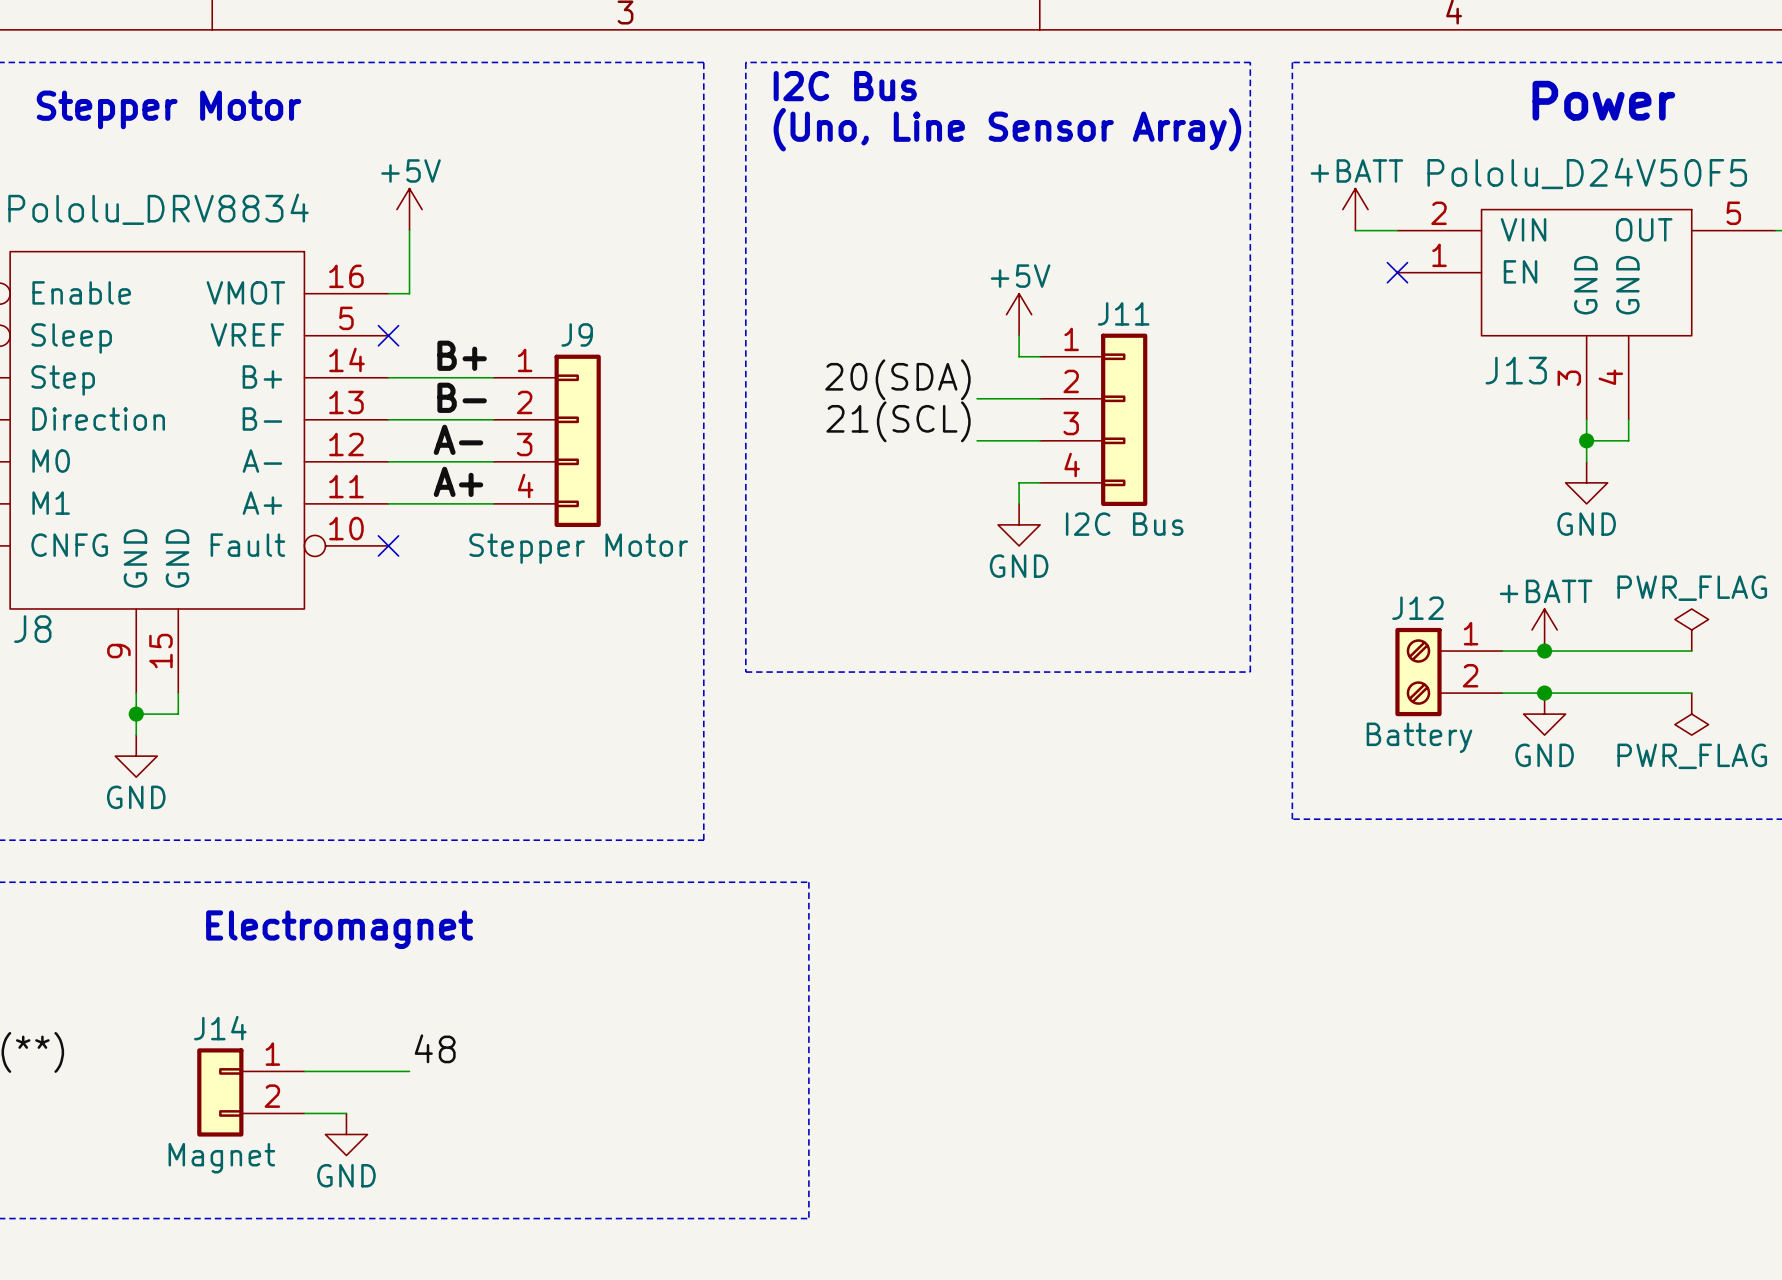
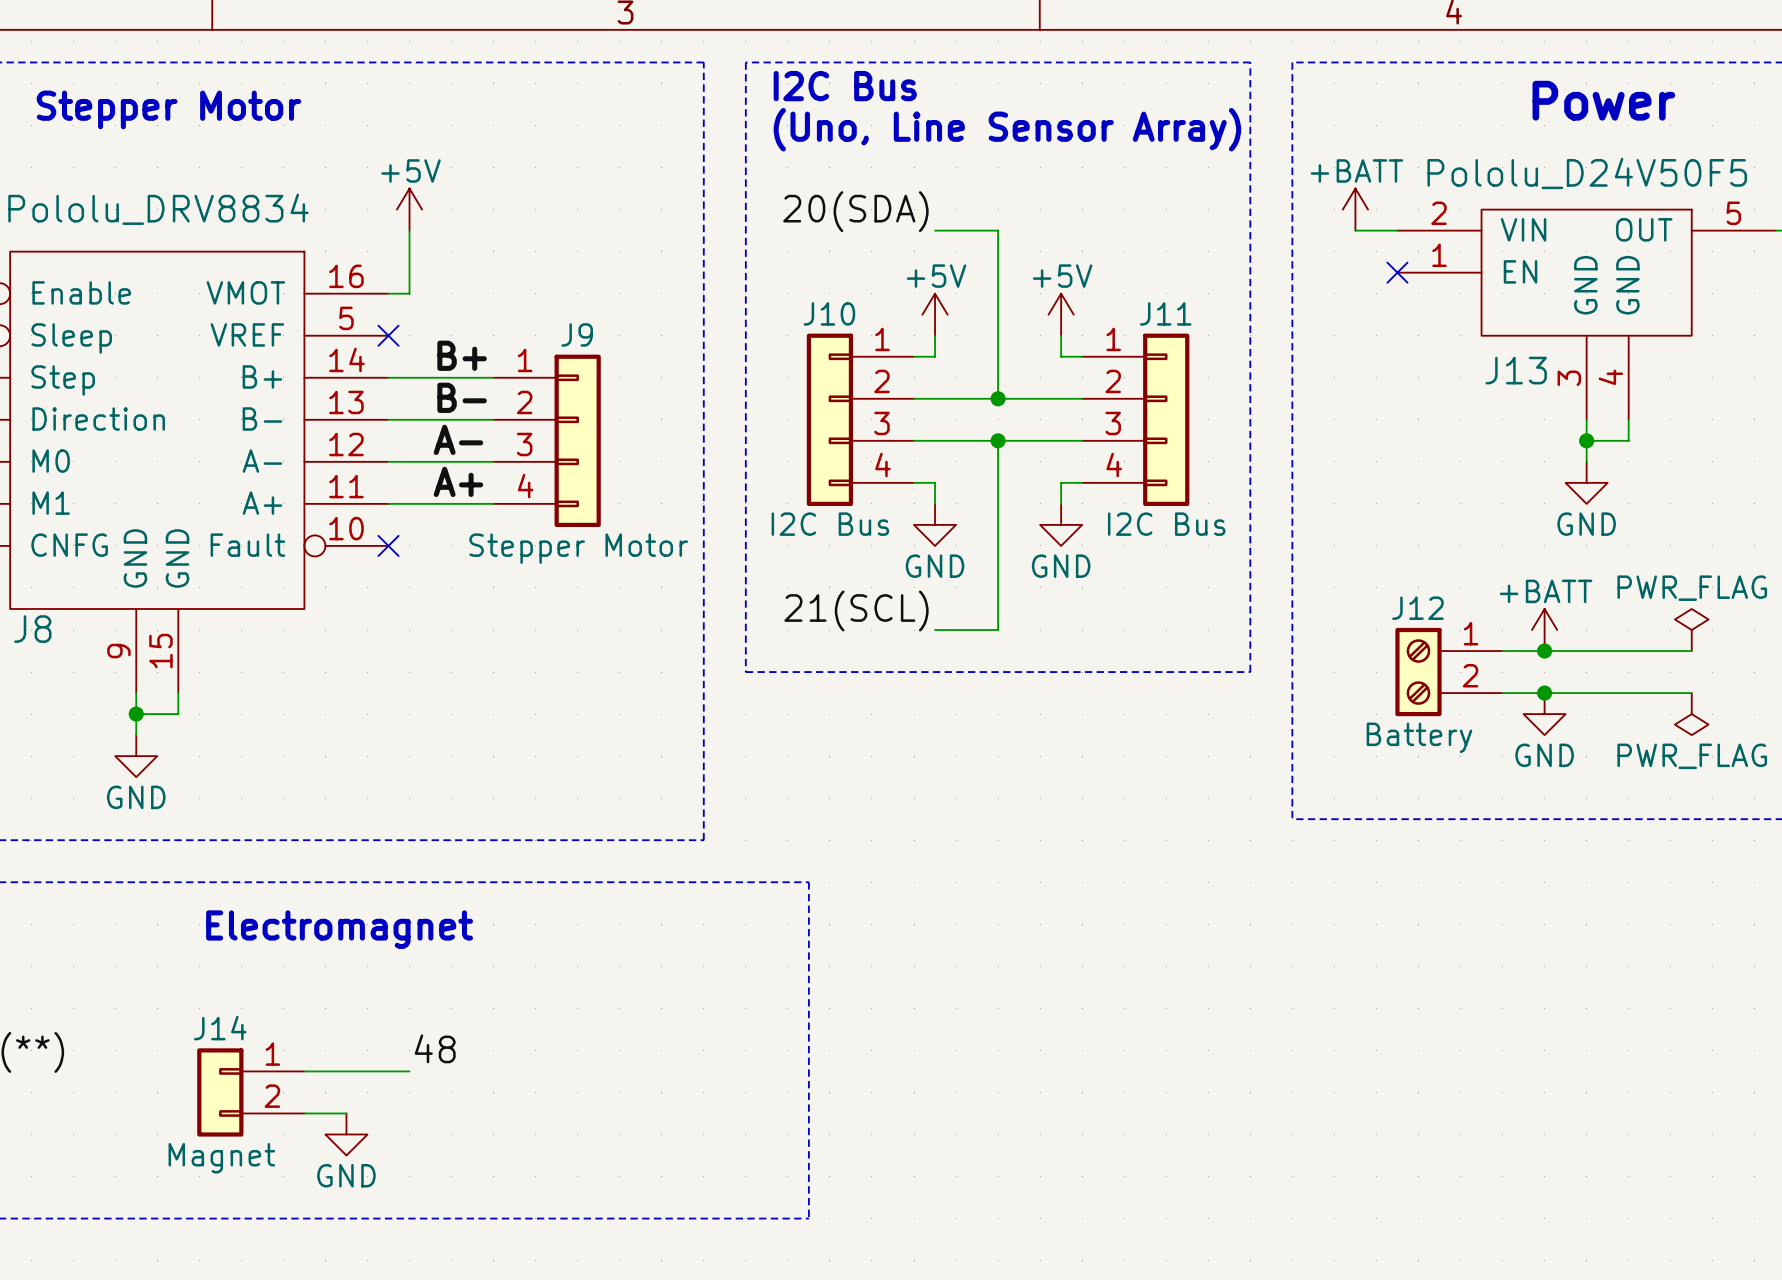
wire: none -> (935, 230) (998, 230) (998, 398)
power symbol: none -> +5V (935, 314)
power symbol: +5V (1019, 314) -> none
power symbol: none -> +5V (1061, 314)
wire: none -> (935, 335) (935, 356) (914, 356)
wire: (1019, 335) (1019, 356) (1040, 356) -> (1061, 335) (1061, 356) (1082, 356)
label position: 20(SDA) (897, 379) -> 20(SDA) (855, 211)
wire: none -> (914, 398) (977, 398)
junction: none -> (998, 398)
J10: none -> I2C Bus (860, 419)
J11 position: (1093, 419) -> (1135, 419)
label position: 21(SCL) (898, 421) -> 21(SCL) (856, 611)
wire: none -> (914, 440) (977, 440)
wire: none -> (998, 440) (998, 630) (935, 630)
junction: none -> (998, 440)
wire: none -> (914, 482) (935, 482) (935, 503)
wire: (1040, 482) (1019, 482) (1019, 503) -> (1082, 482) (1061, 482) (1061, 503)
power symbol: none -> GND (935, 524)
power symbol: GND (1019, 524) -> none
power symbol: none -> GND (1061, 524)

